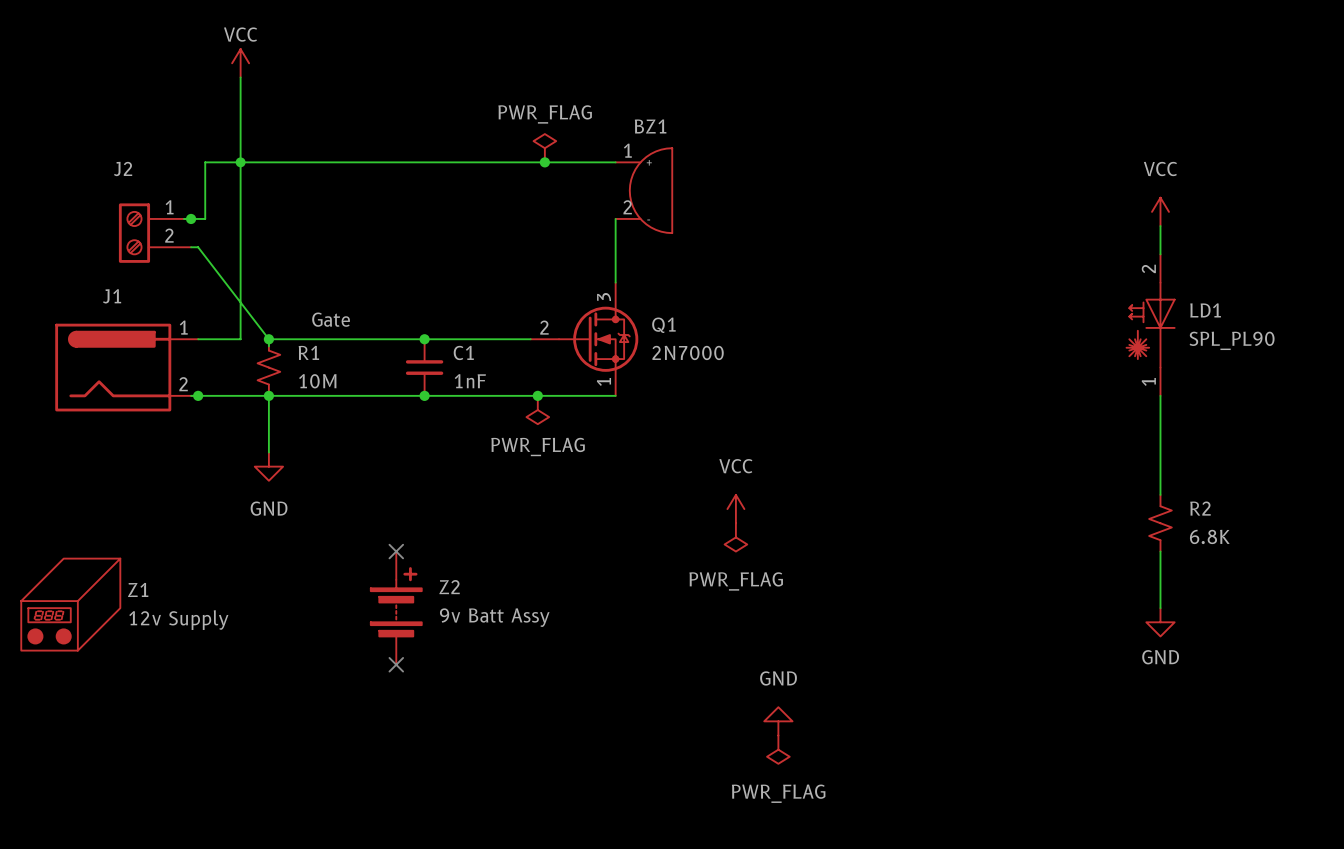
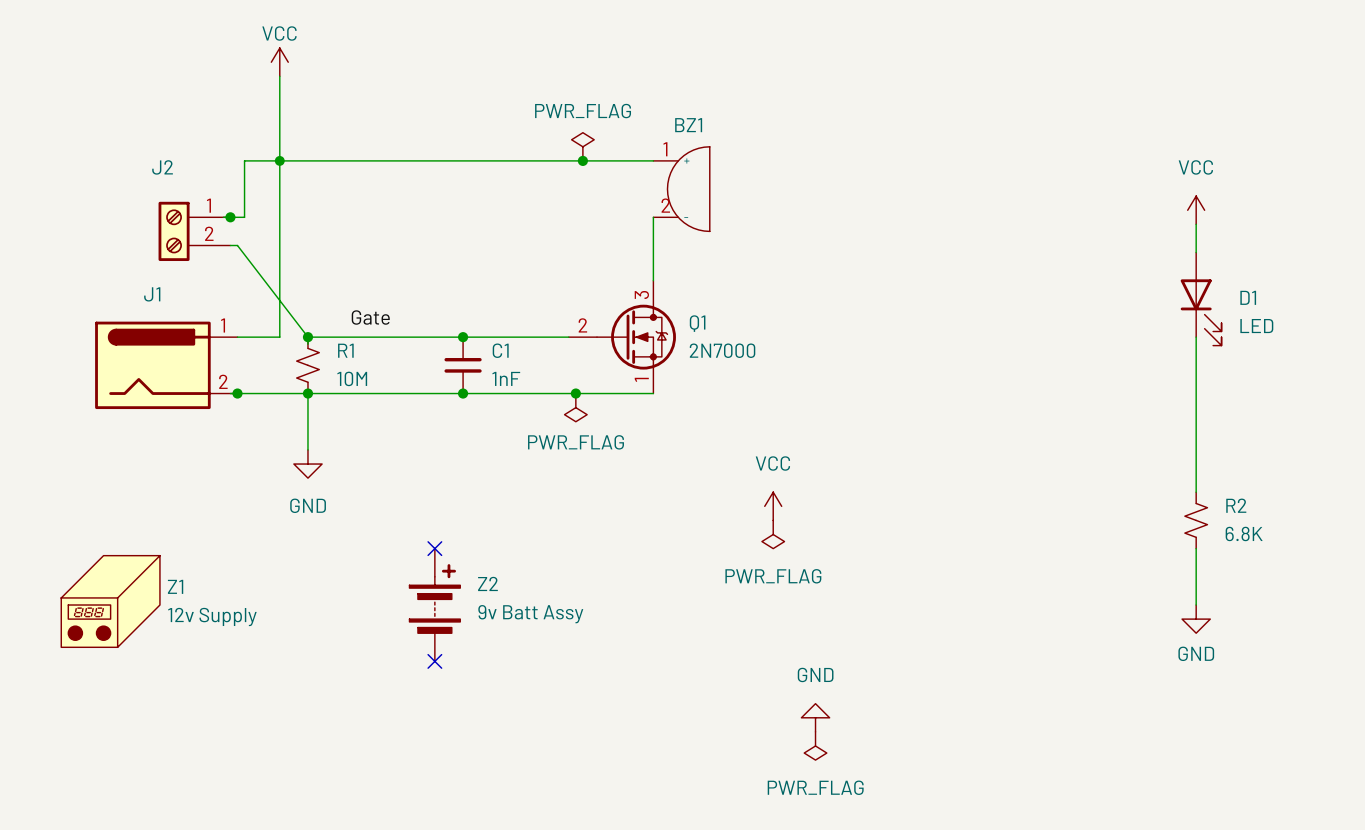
D1: none -> LED (1201, 299)
LD1: SPL_PL90 (1151, 325) -> none

